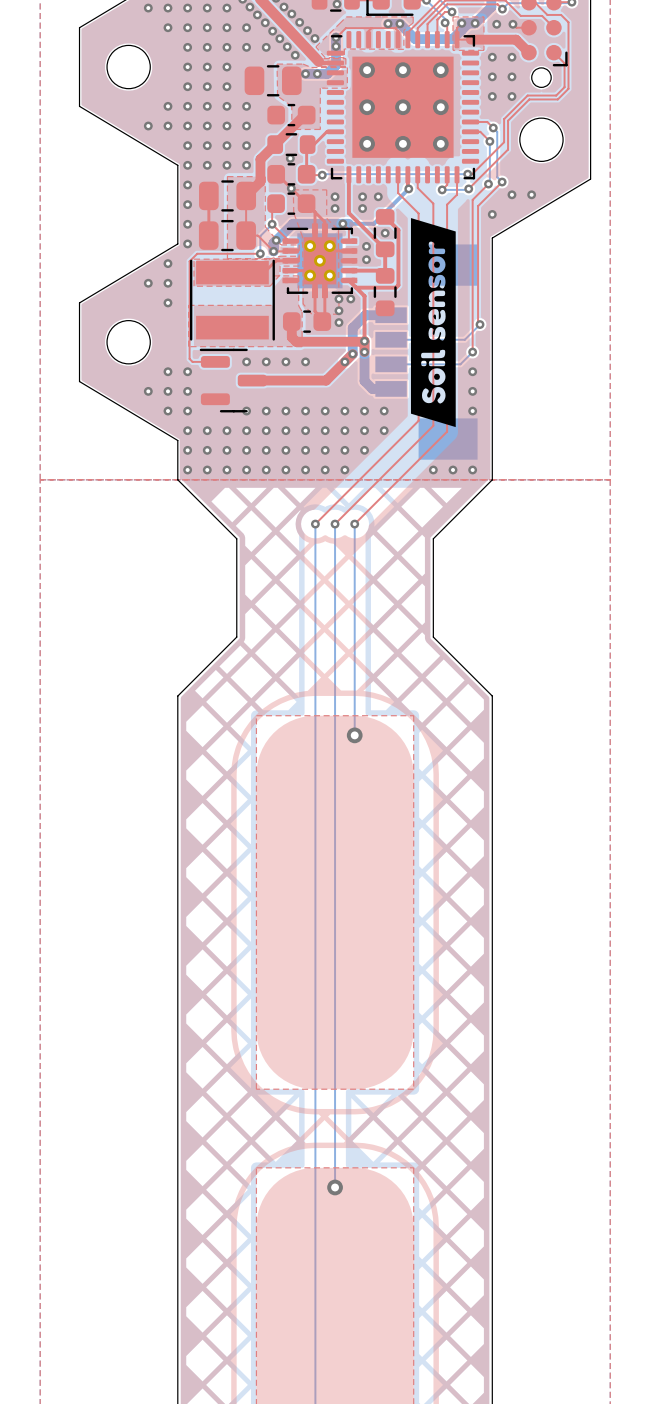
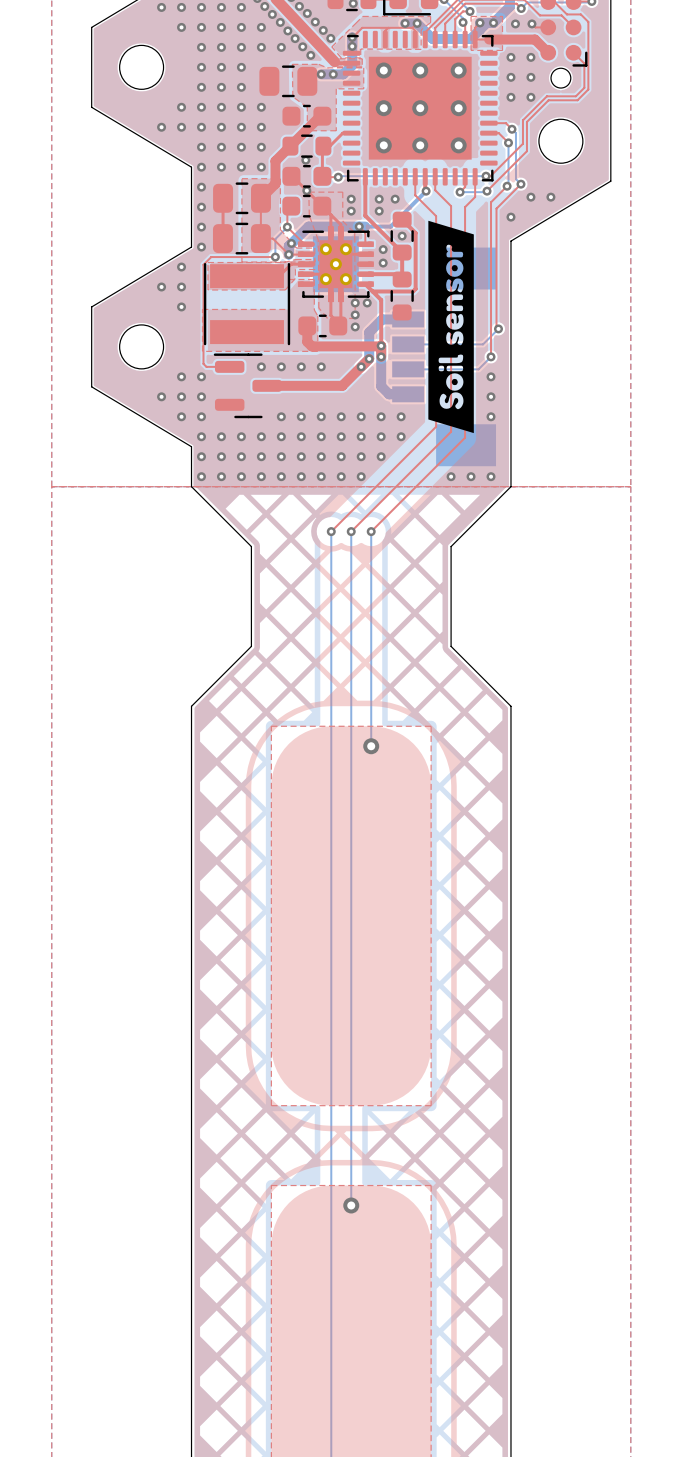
via: (246, 411) -> none

